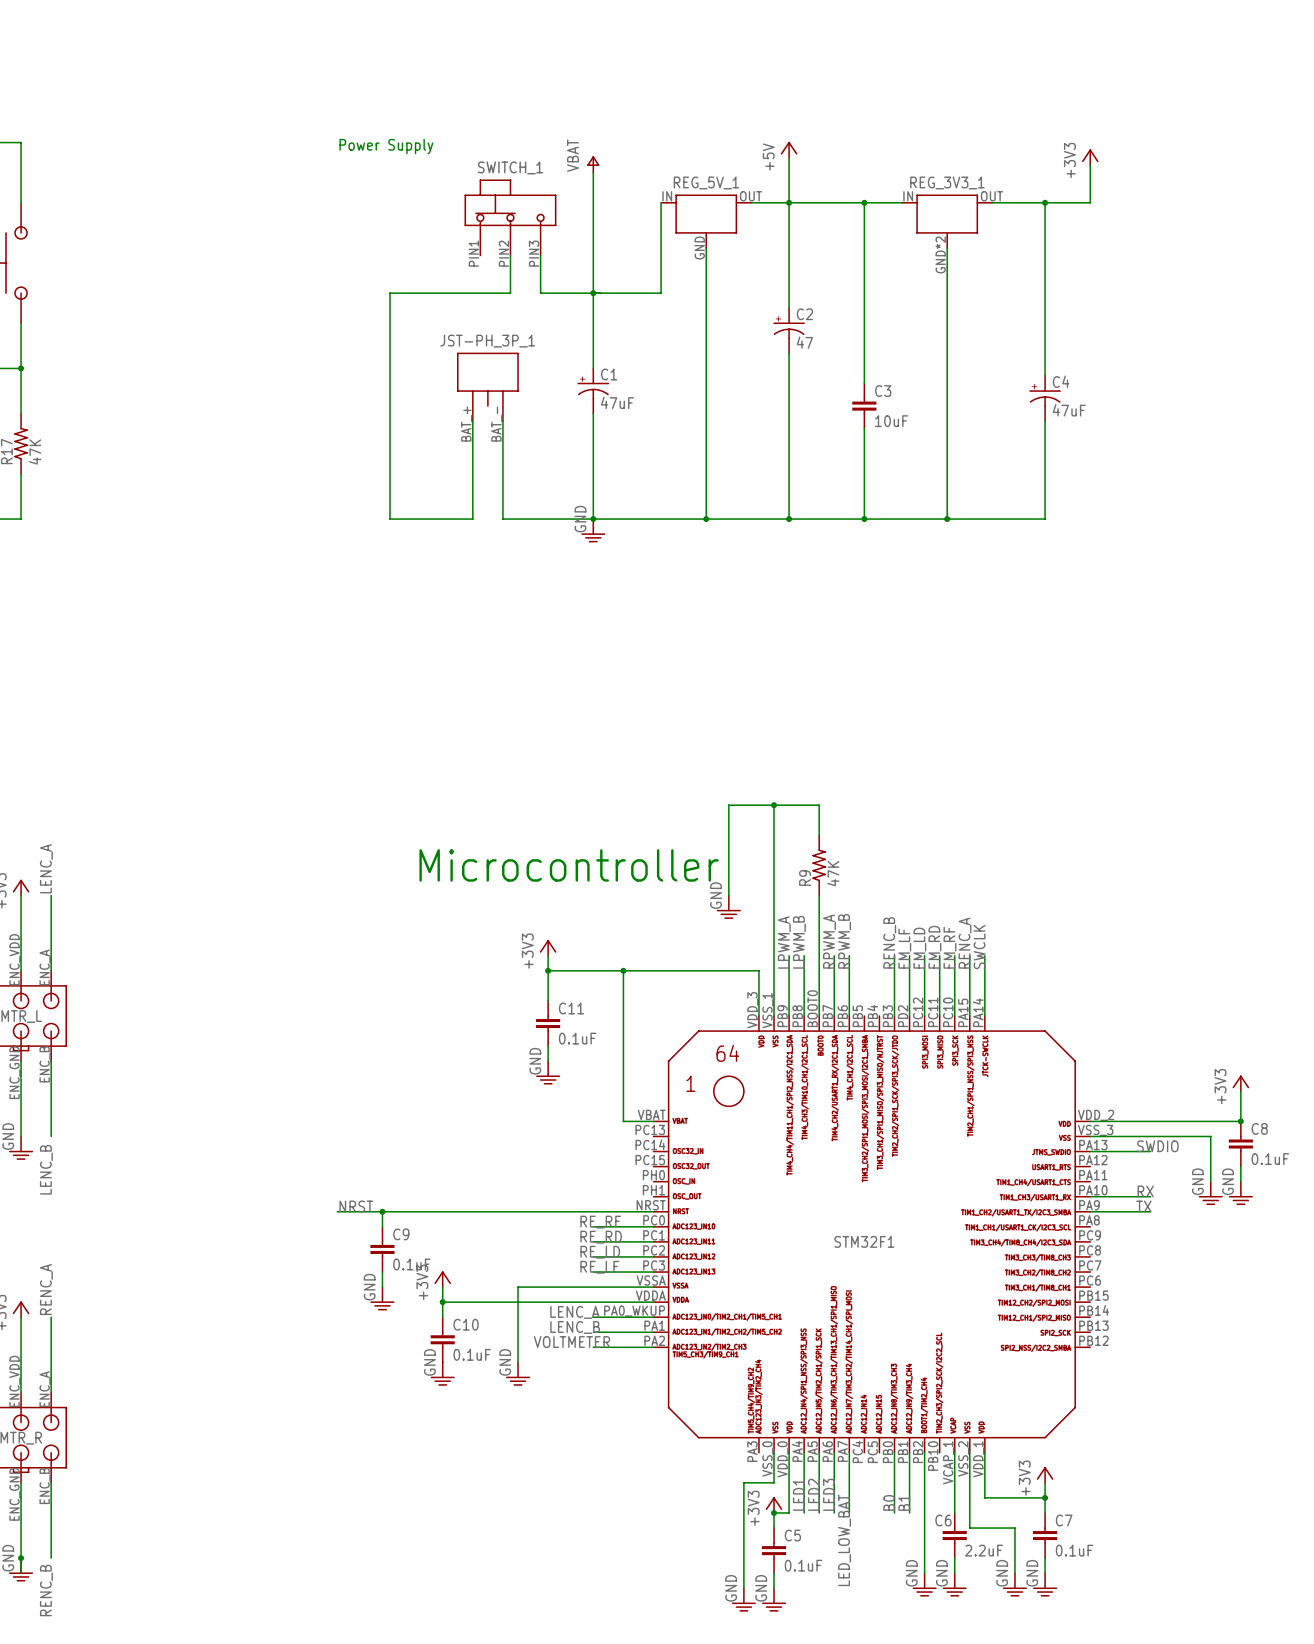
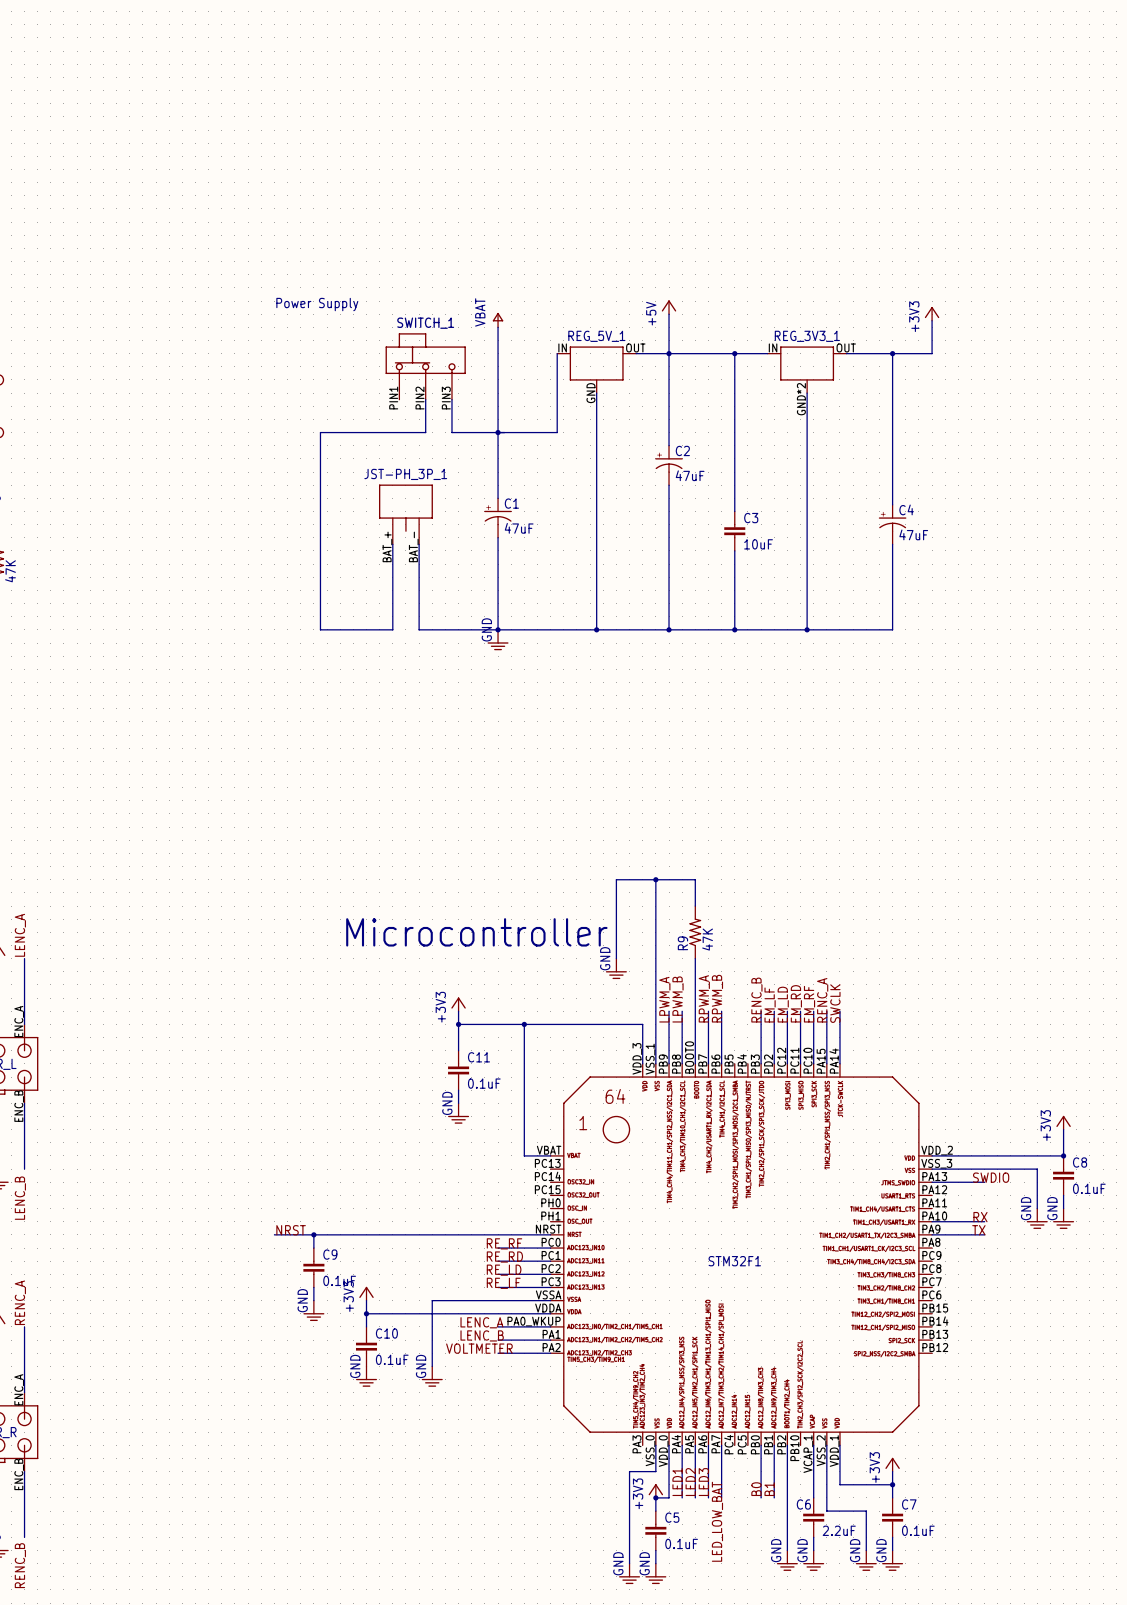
C2 value: 47 (804, 342) -> 47uF (690, 475)

